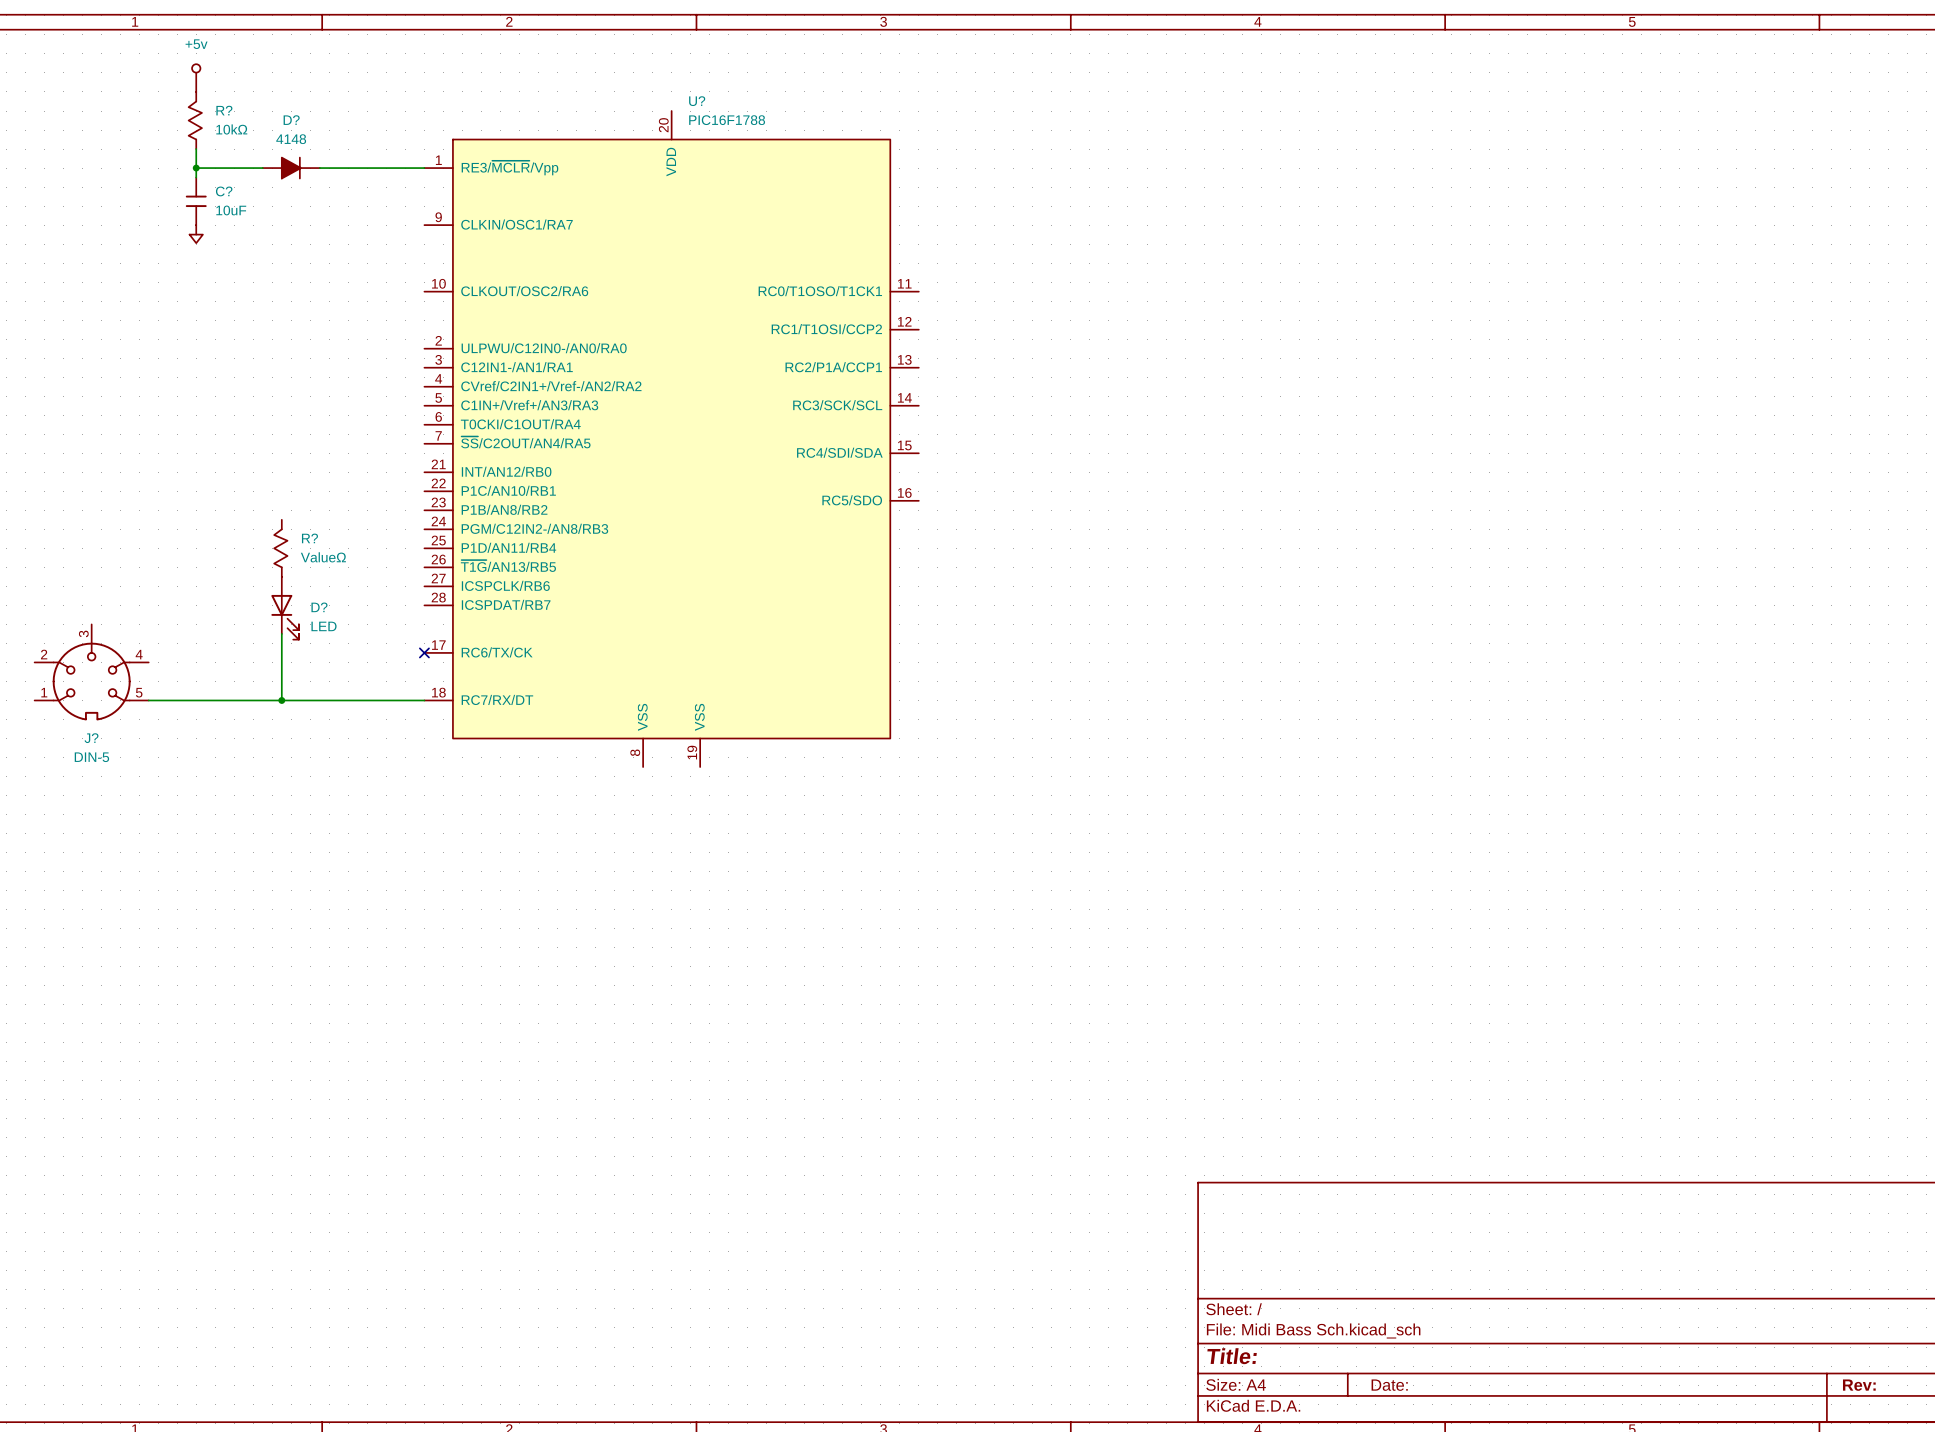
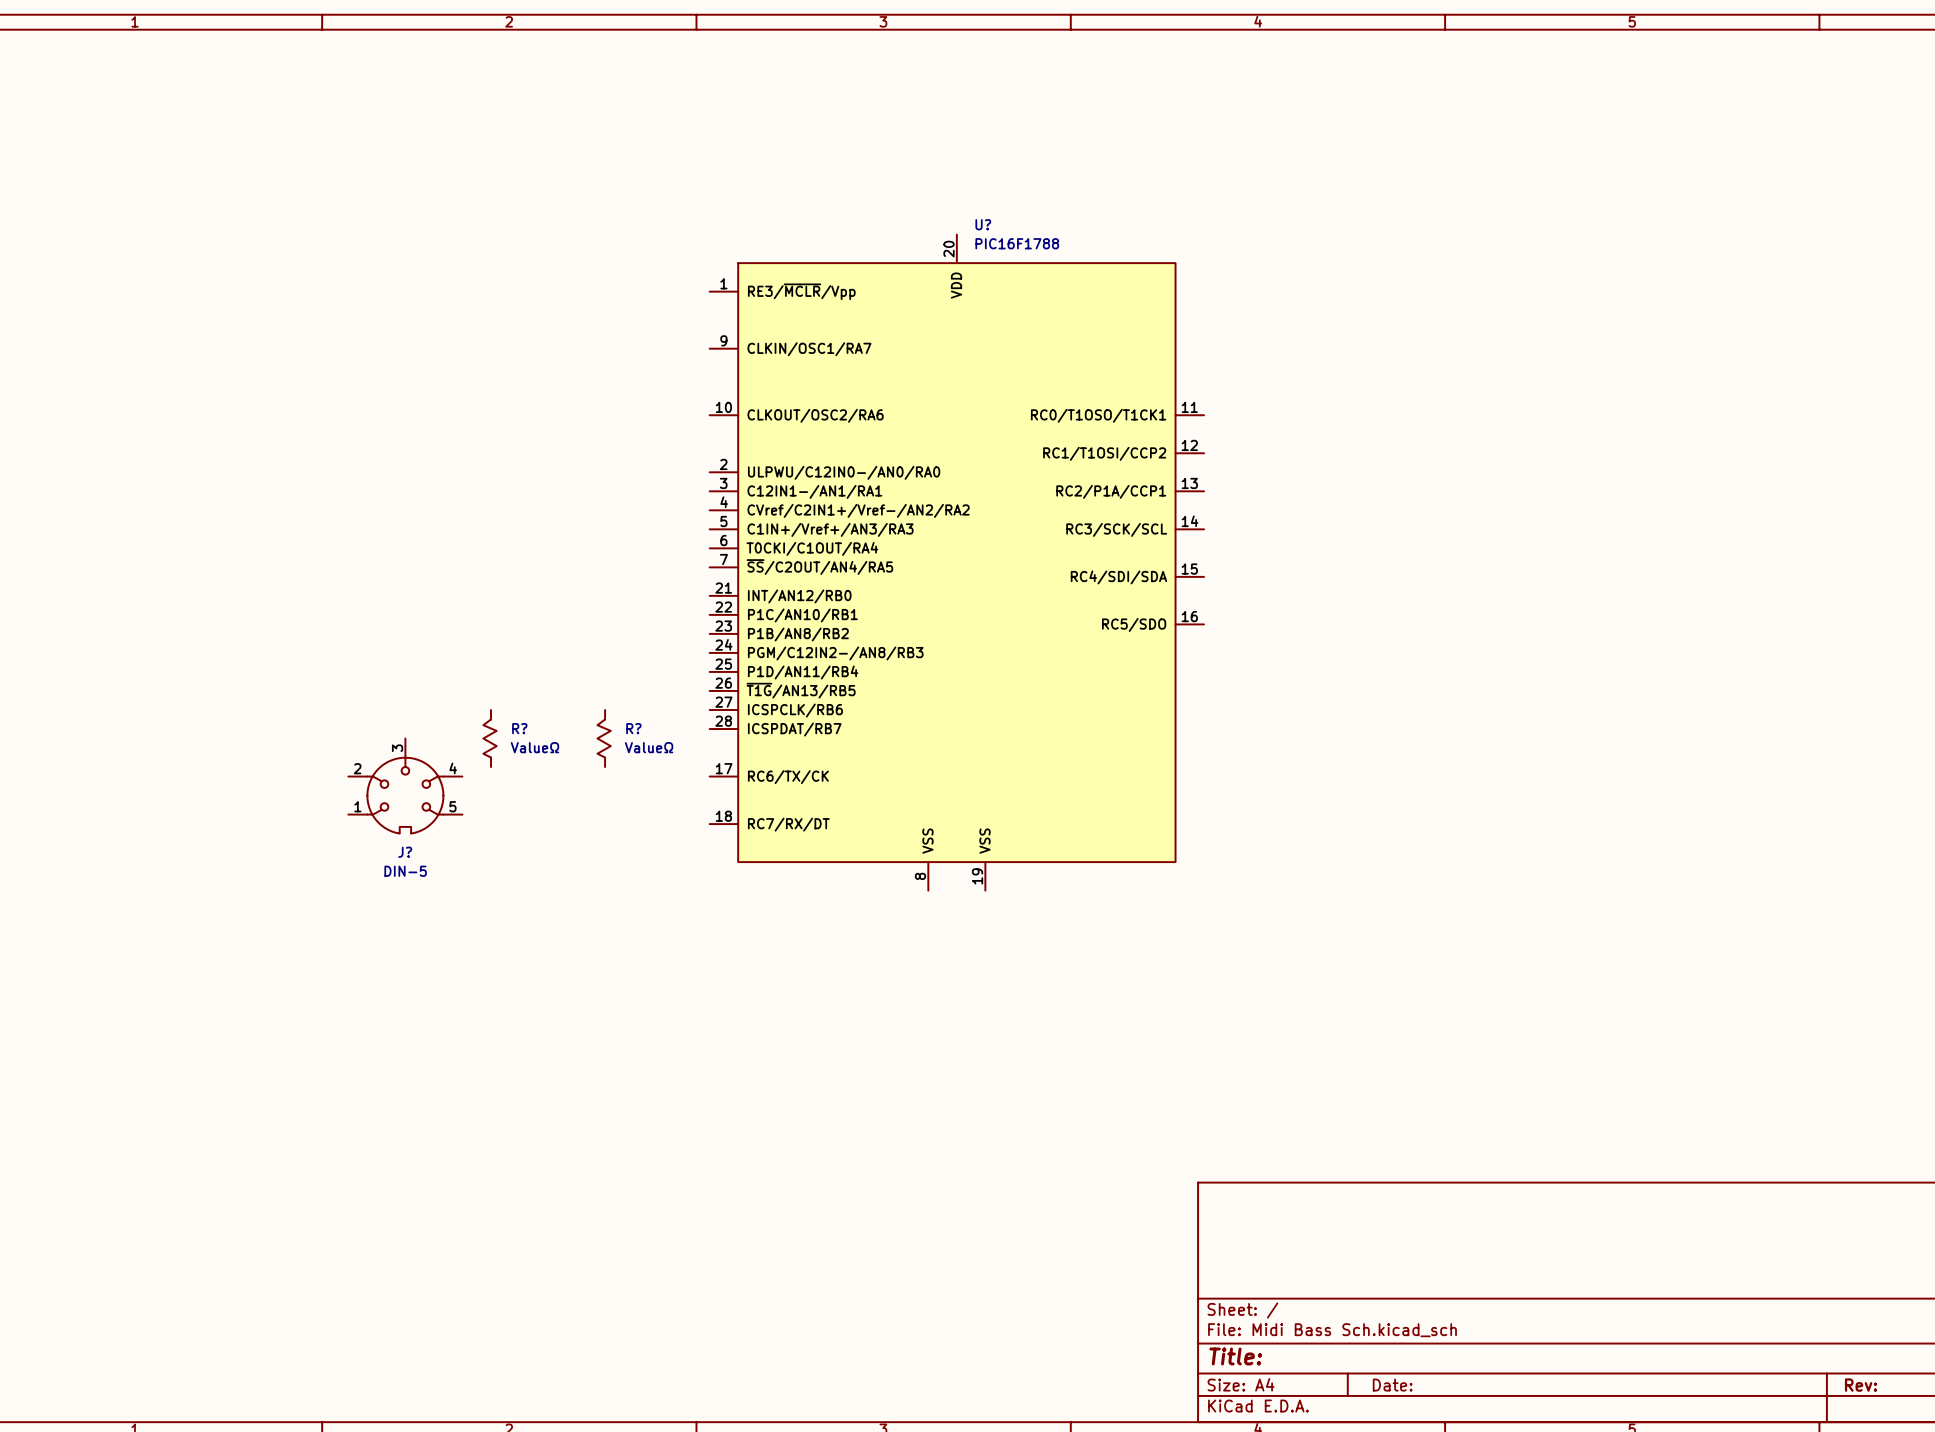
power symbol: +5v (196, 78) -> none
R?: 10kΩ (195, 120) -> none
wire: (196, 149) (196, 177) -> none
wire: (196, 168) (262, 168) -> none
junction: (196, 168) -> none
D?: 4148 (291, 168) -> none
wire: (319, 168) (424, 168) -> none
C?: 10uF (196, 201) -> none
power symbol: (196, 234) -> none
U?: PIC16F1788 (671, 439) -> none
R?: ValueΩ (280, 548) -> none
U?: none -> PIC16F1788 (956, 562)
D?: LED (285, 608) -> none
wire: (281, 633) (281, 700) -> none
no-connect mark: (424, 652) -> none
J?: DIN-5 (91, 672) -> none
wire: (148, 700) (424, 700) -> none
junction: (281, 700) -> none
R?: none -> ValueΩ (490, 738)
R?: none -> ValueΩ (604, 738)
J?: none -> DIN-5 (405, 786)

